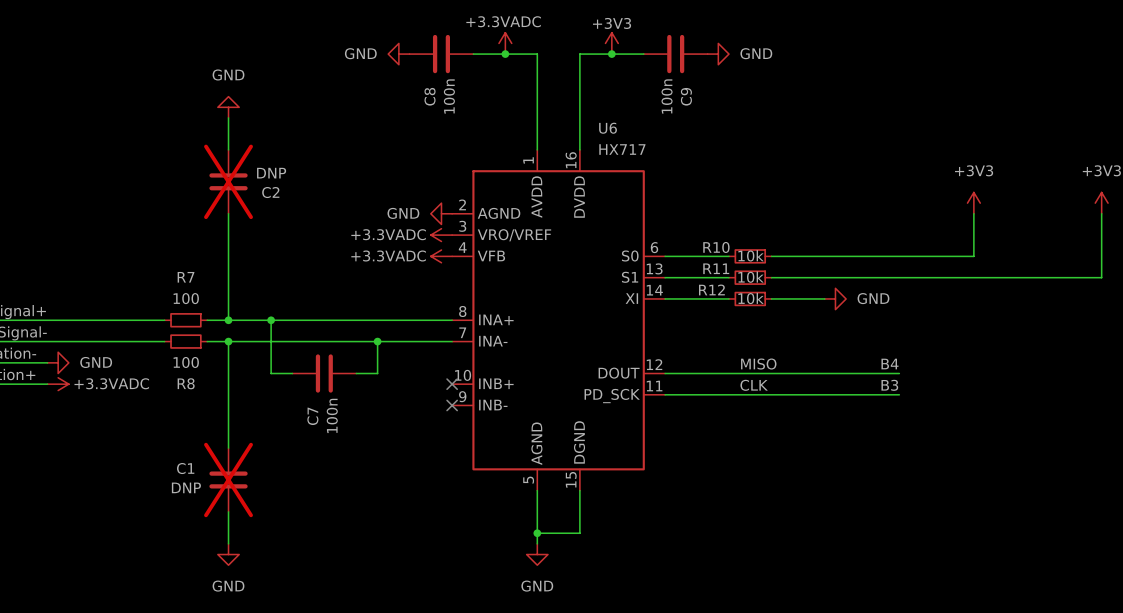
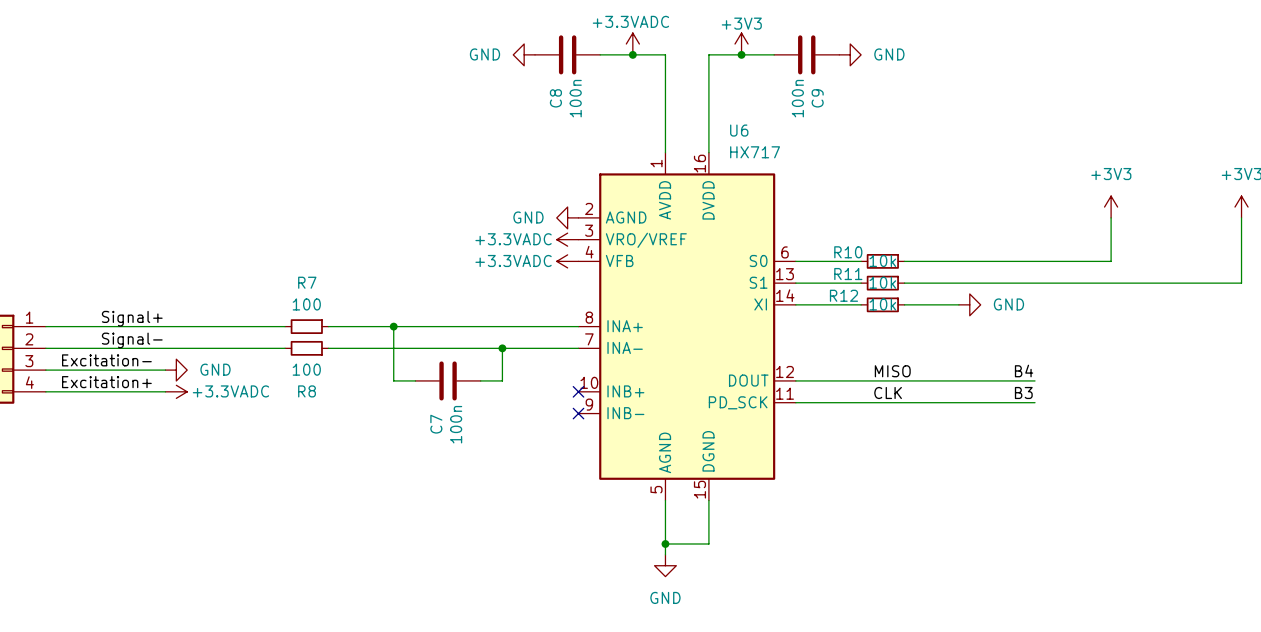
power symbol: GND (228, 107) -> none
wire: (228, 117) (228, 149) -> none
C2: DNP (228, 181) -> none
wire: (228, 213) (228, 320) -> none
junction: (228, 320) -> none
wire: (228, 341) (228, 448) -> none
junction: (228, 341) -> none
C1: DNP (228, 479) -> none
wire: (228, 511) (228, 543) -> none
power symbol: GND (228, 554) -> none

